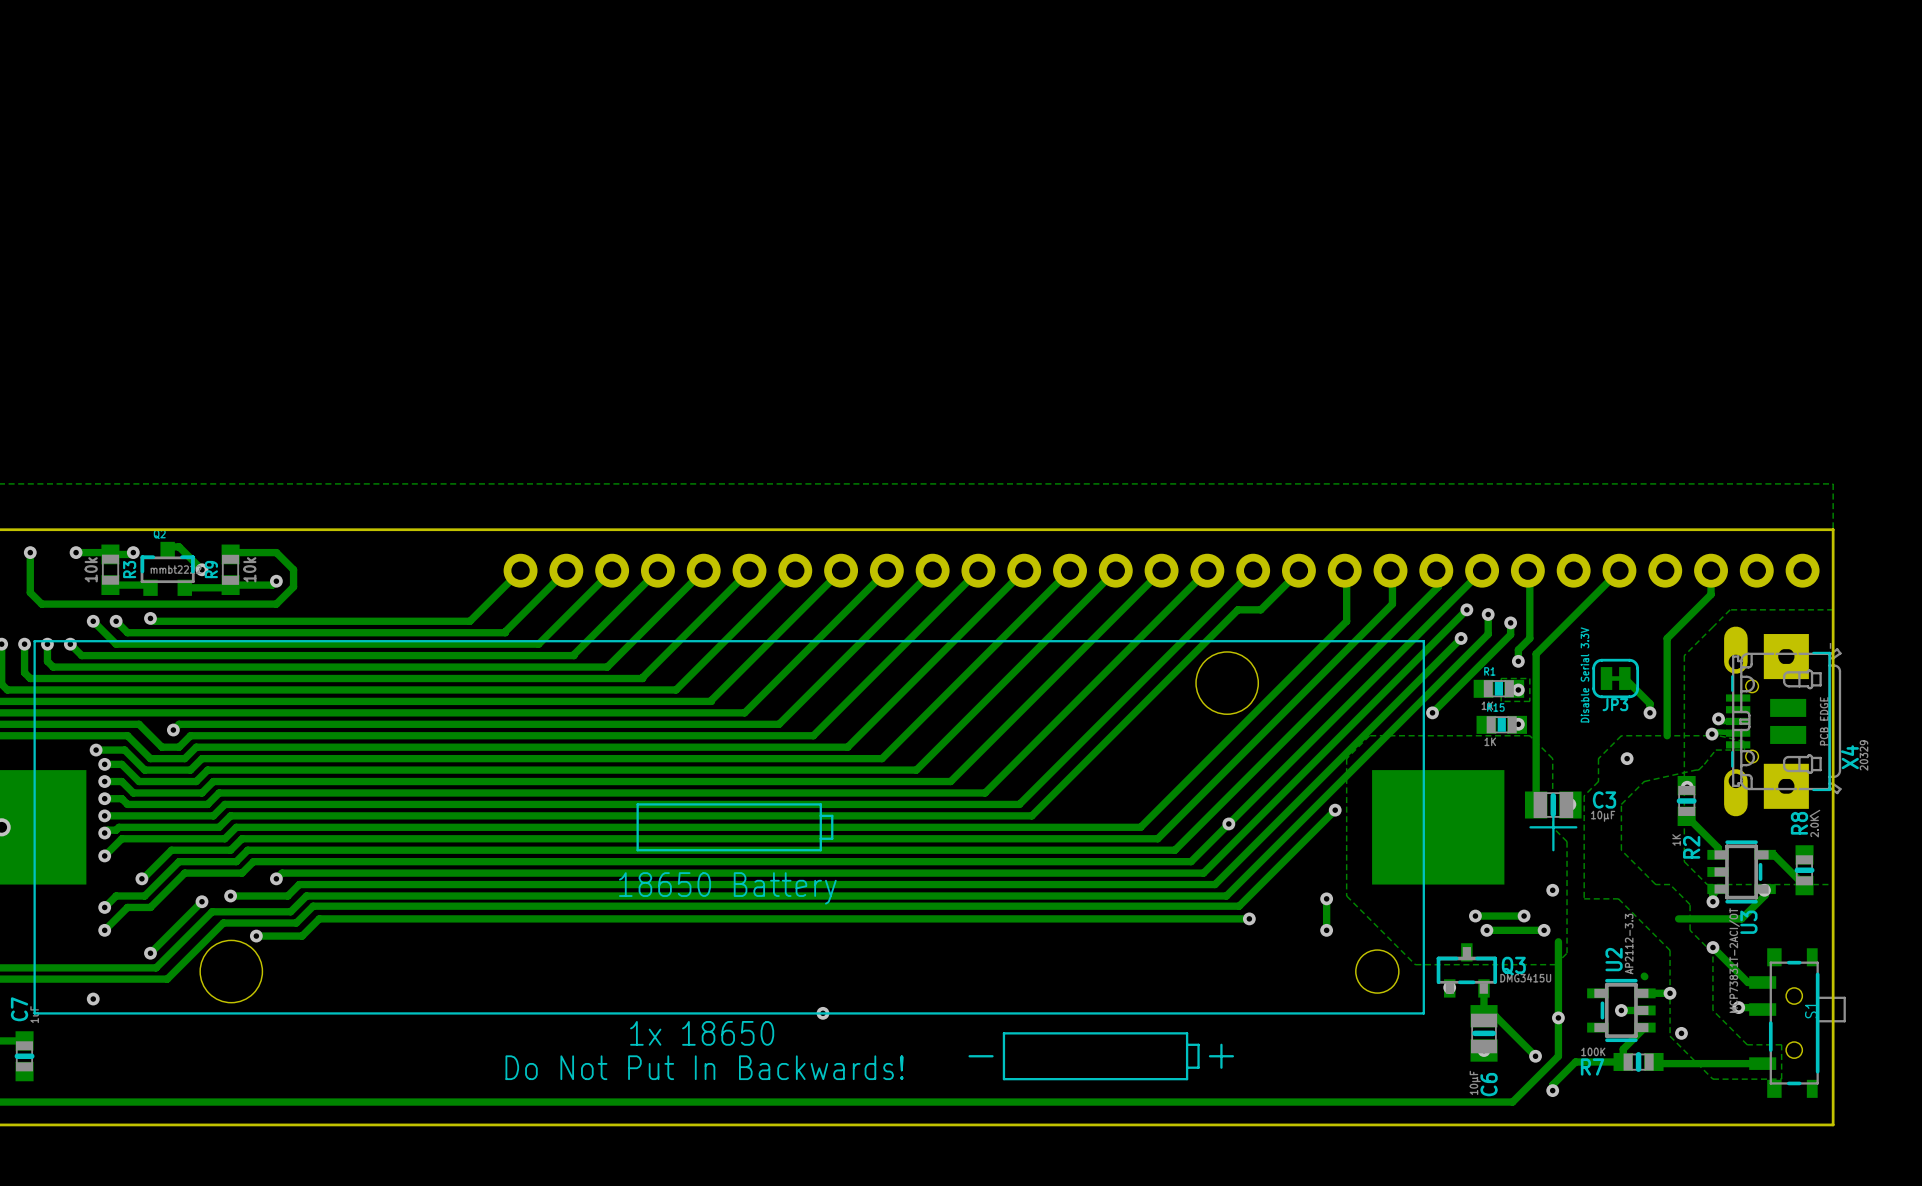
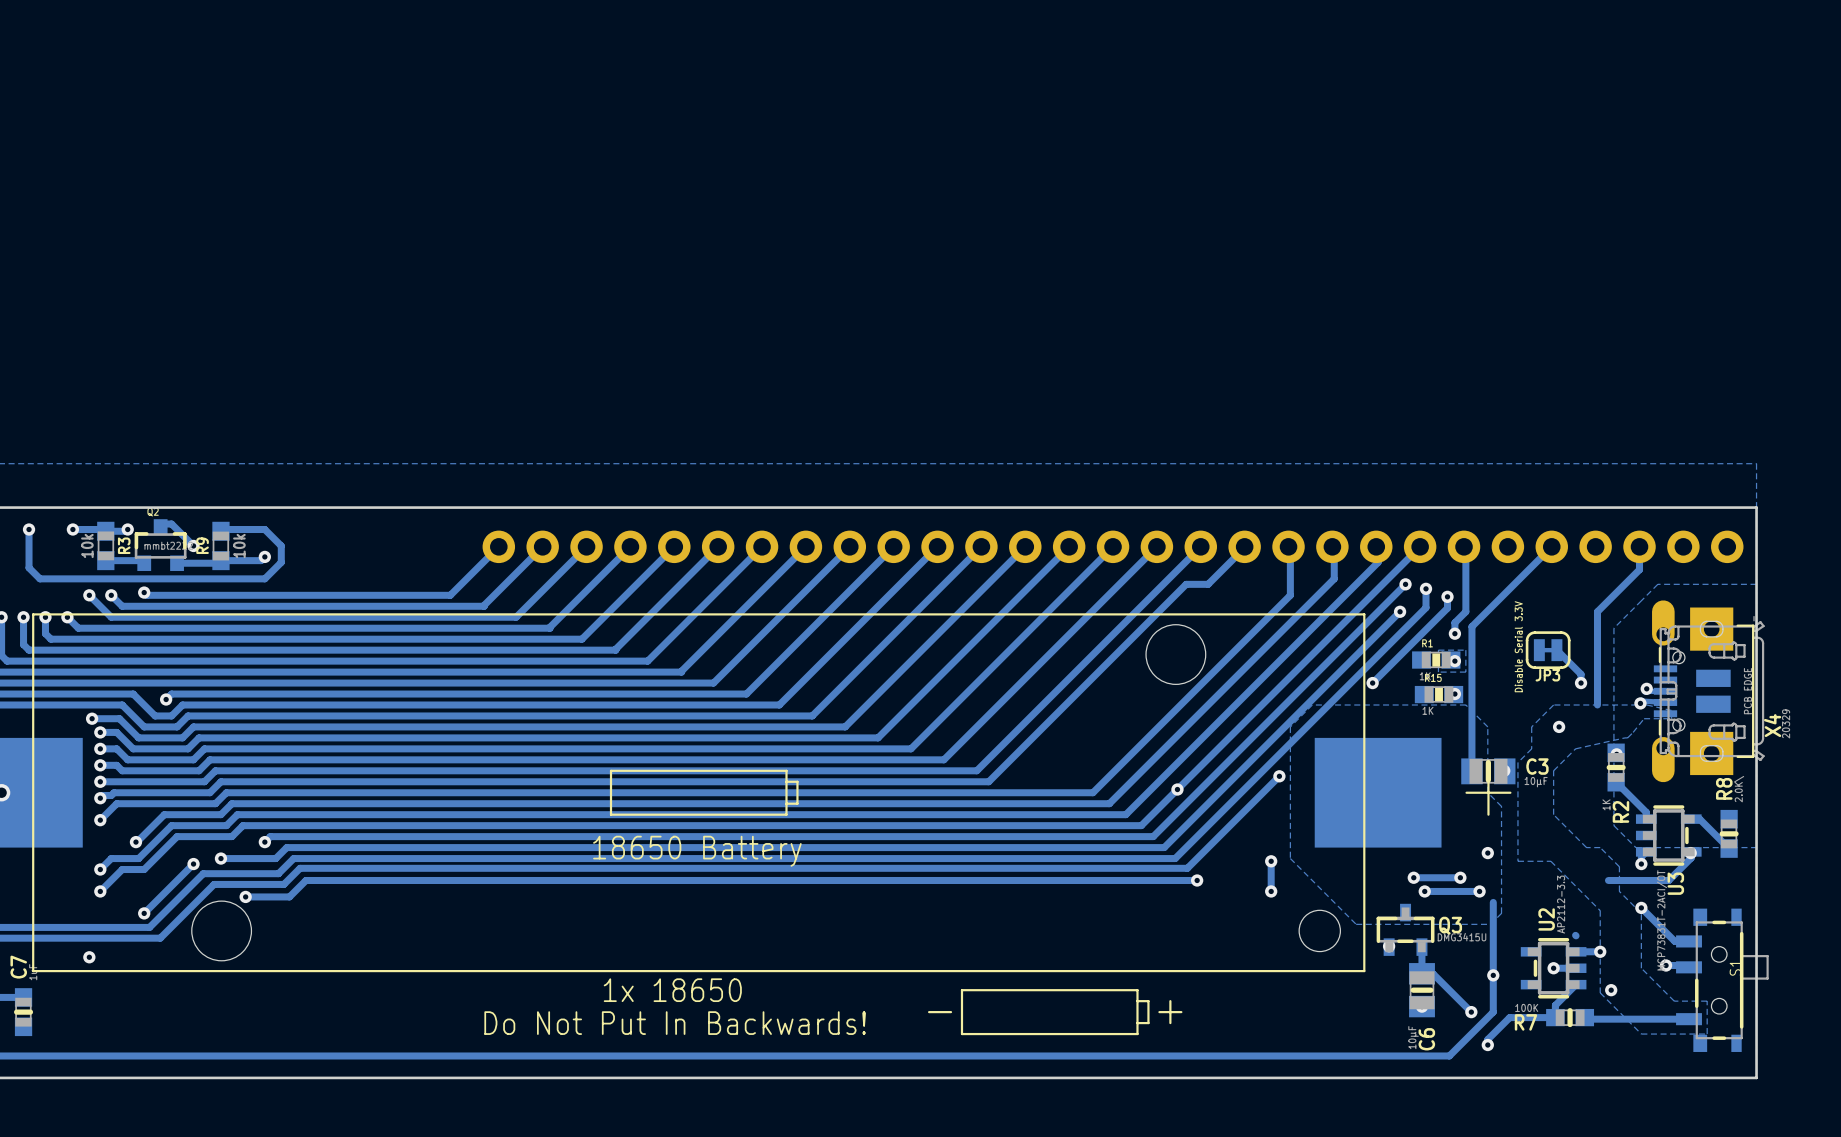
via: (822, 1013) -> none

